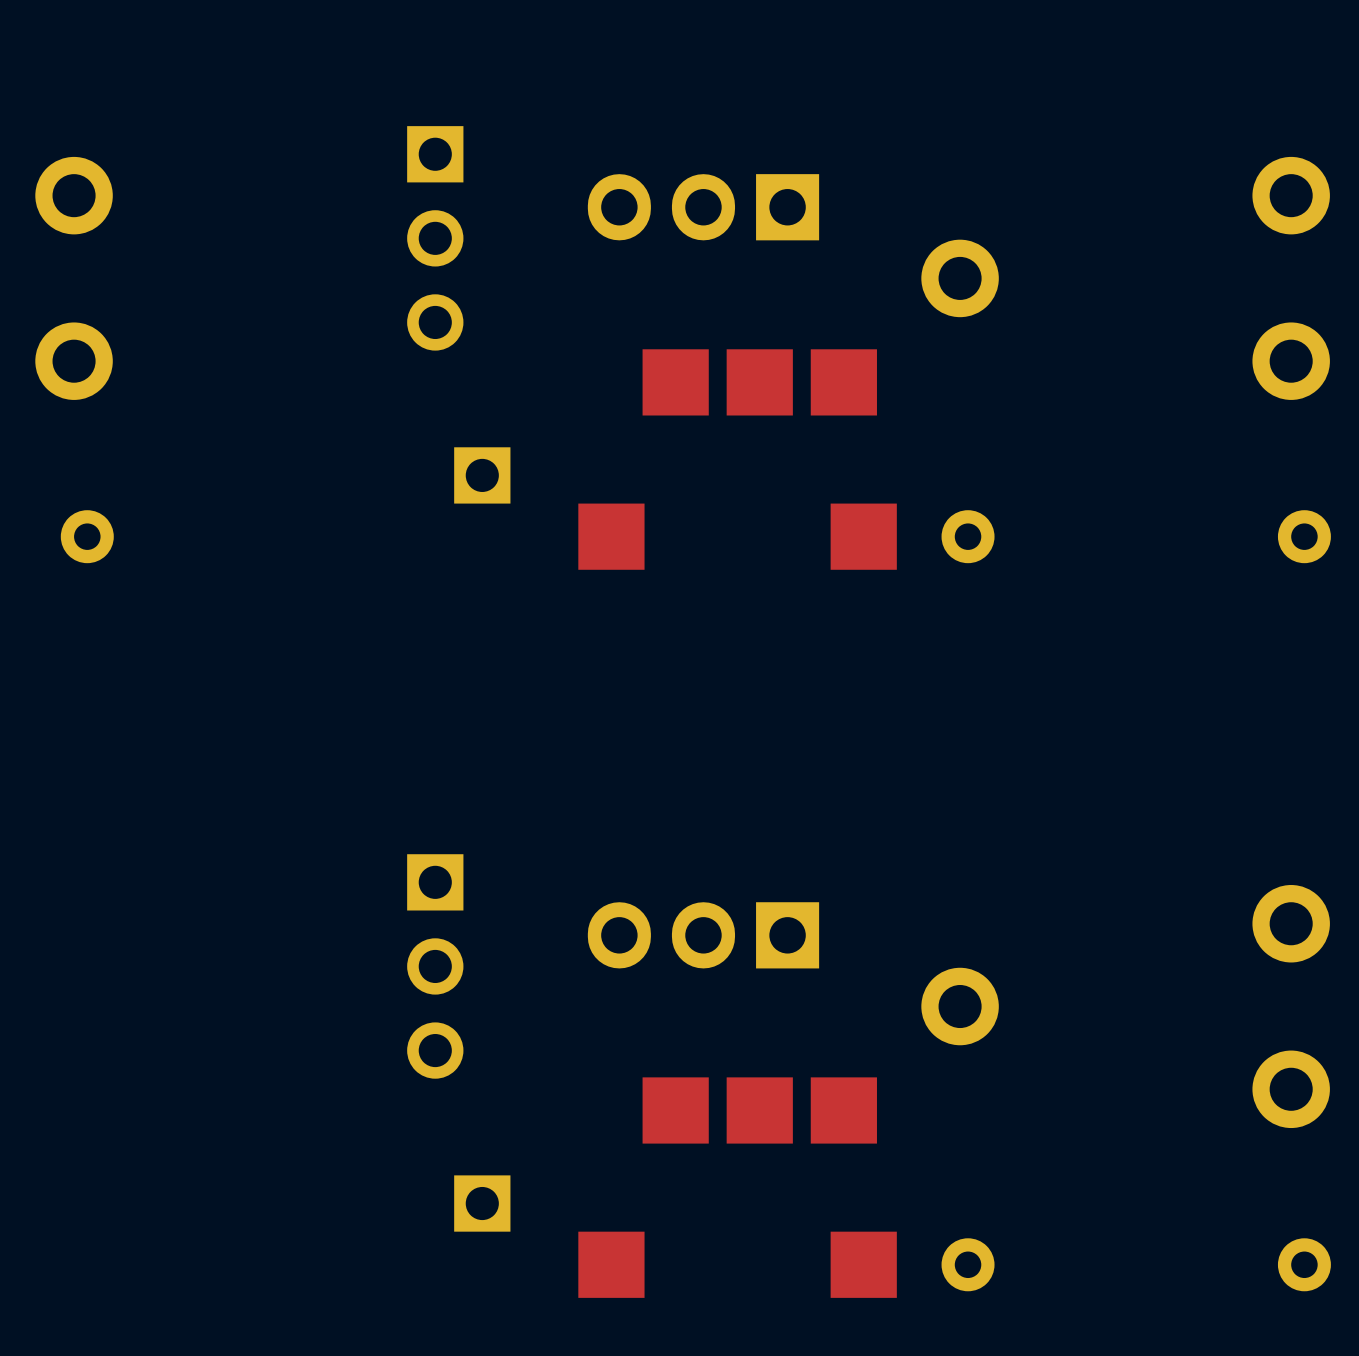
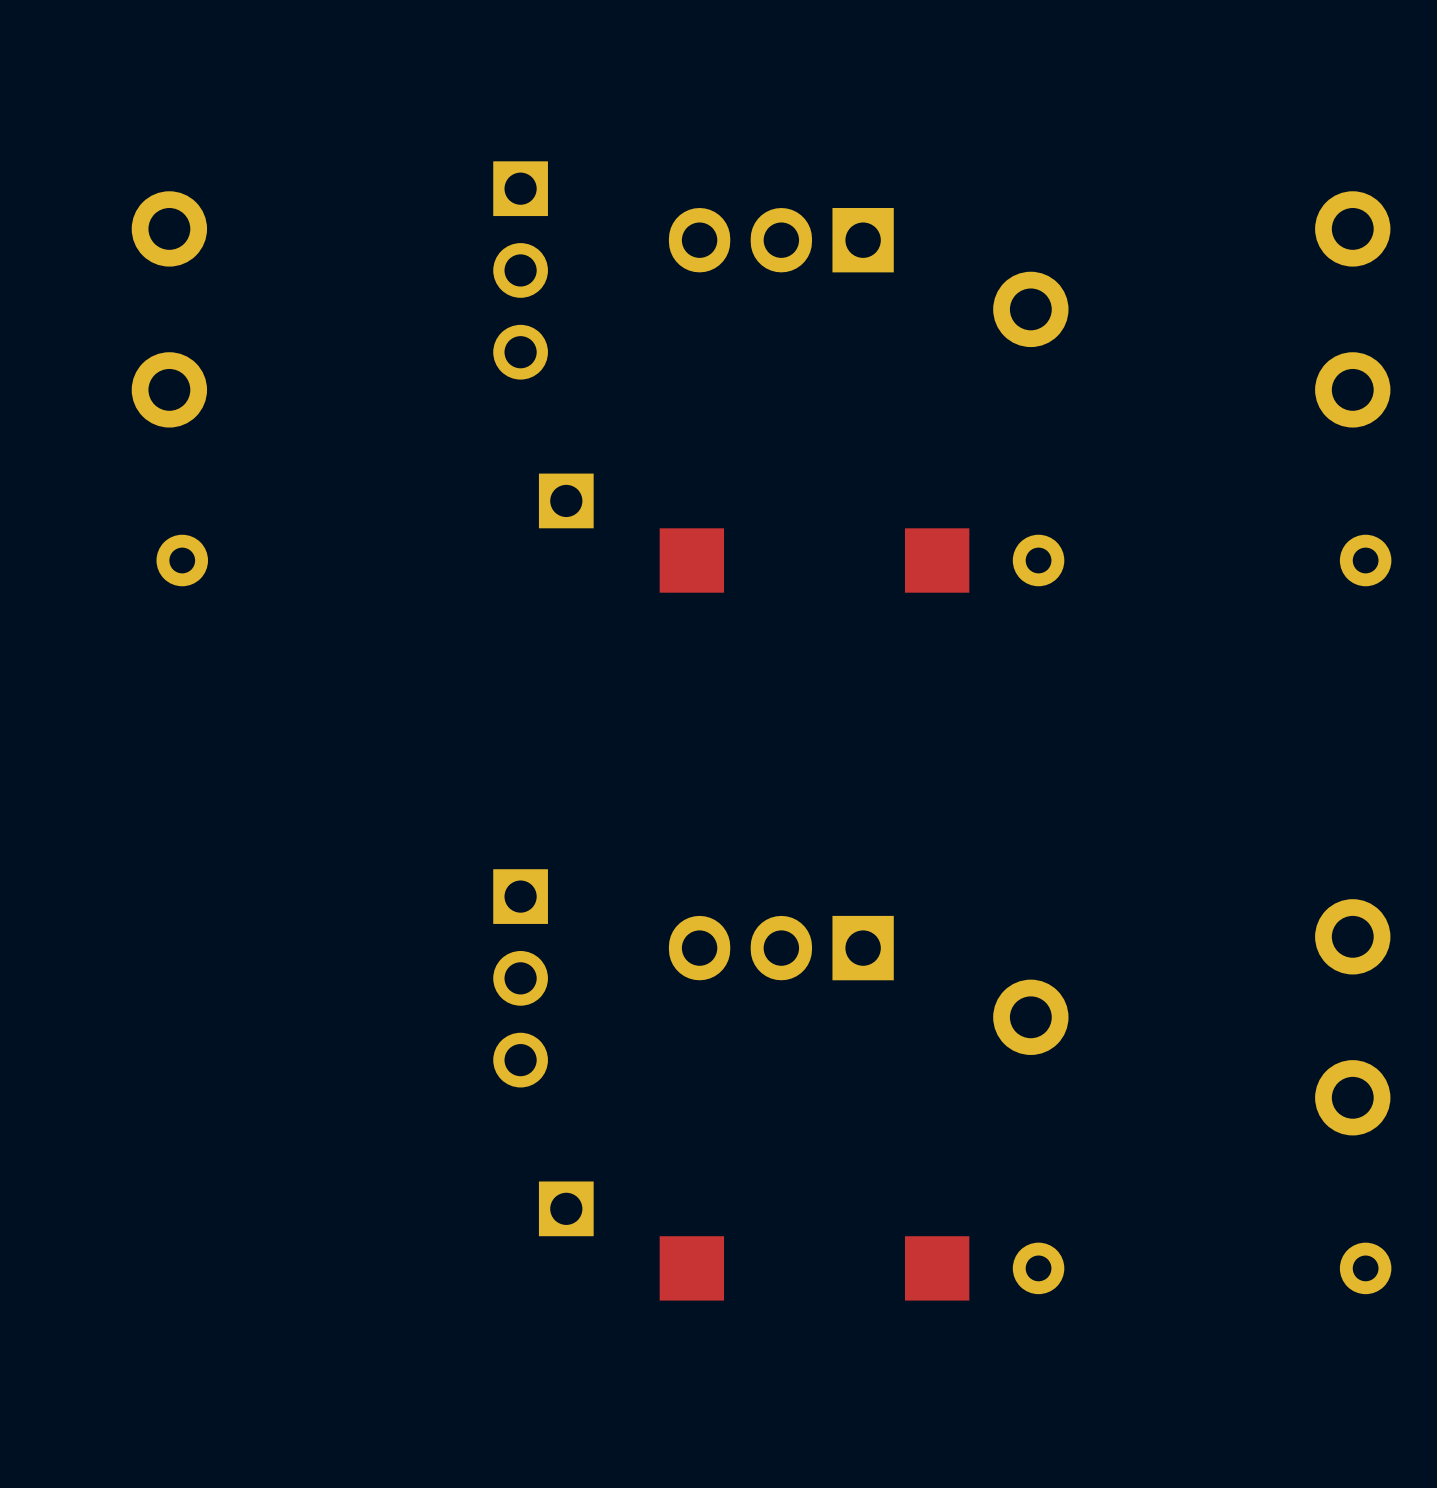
part: (759, 382) -> none
part: (759, 1110) -> none

